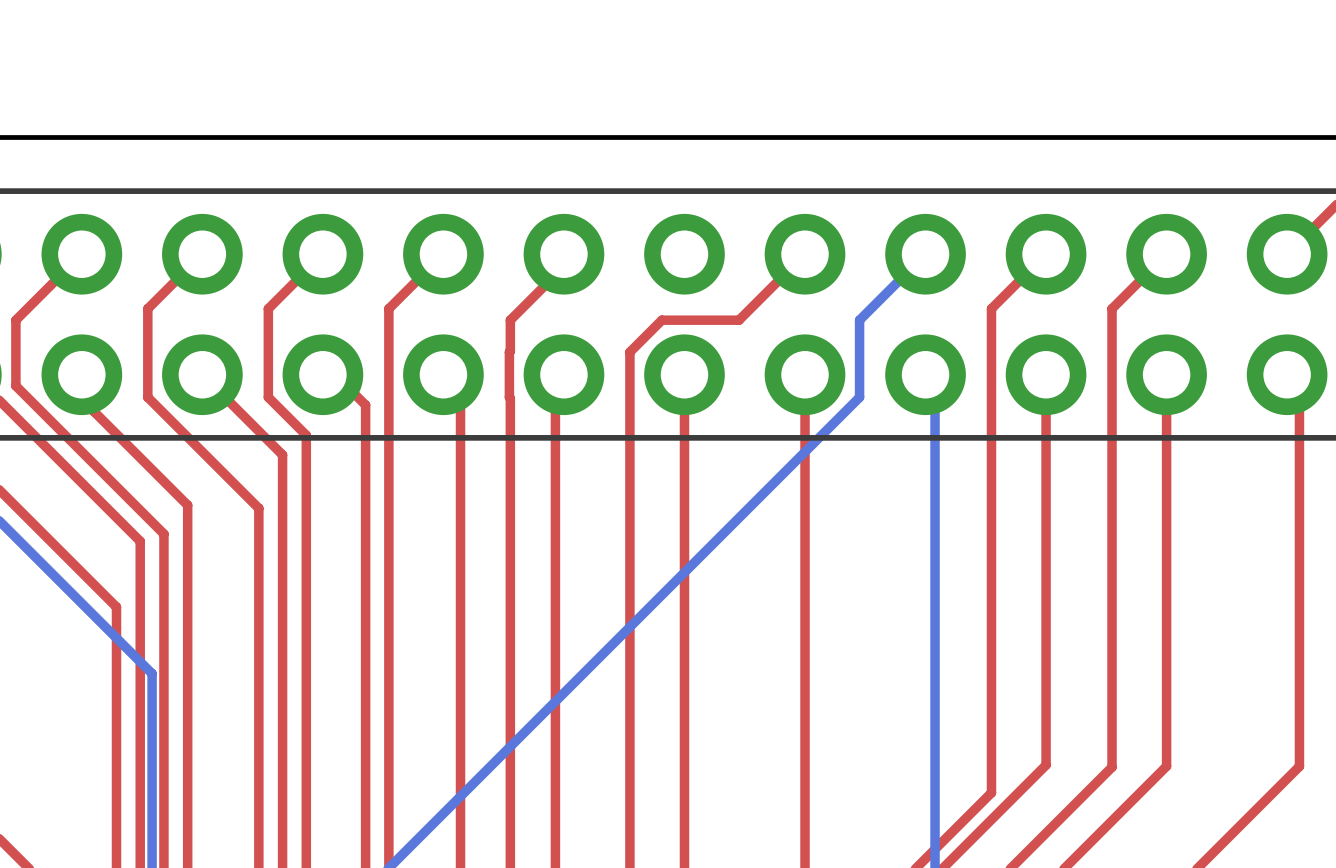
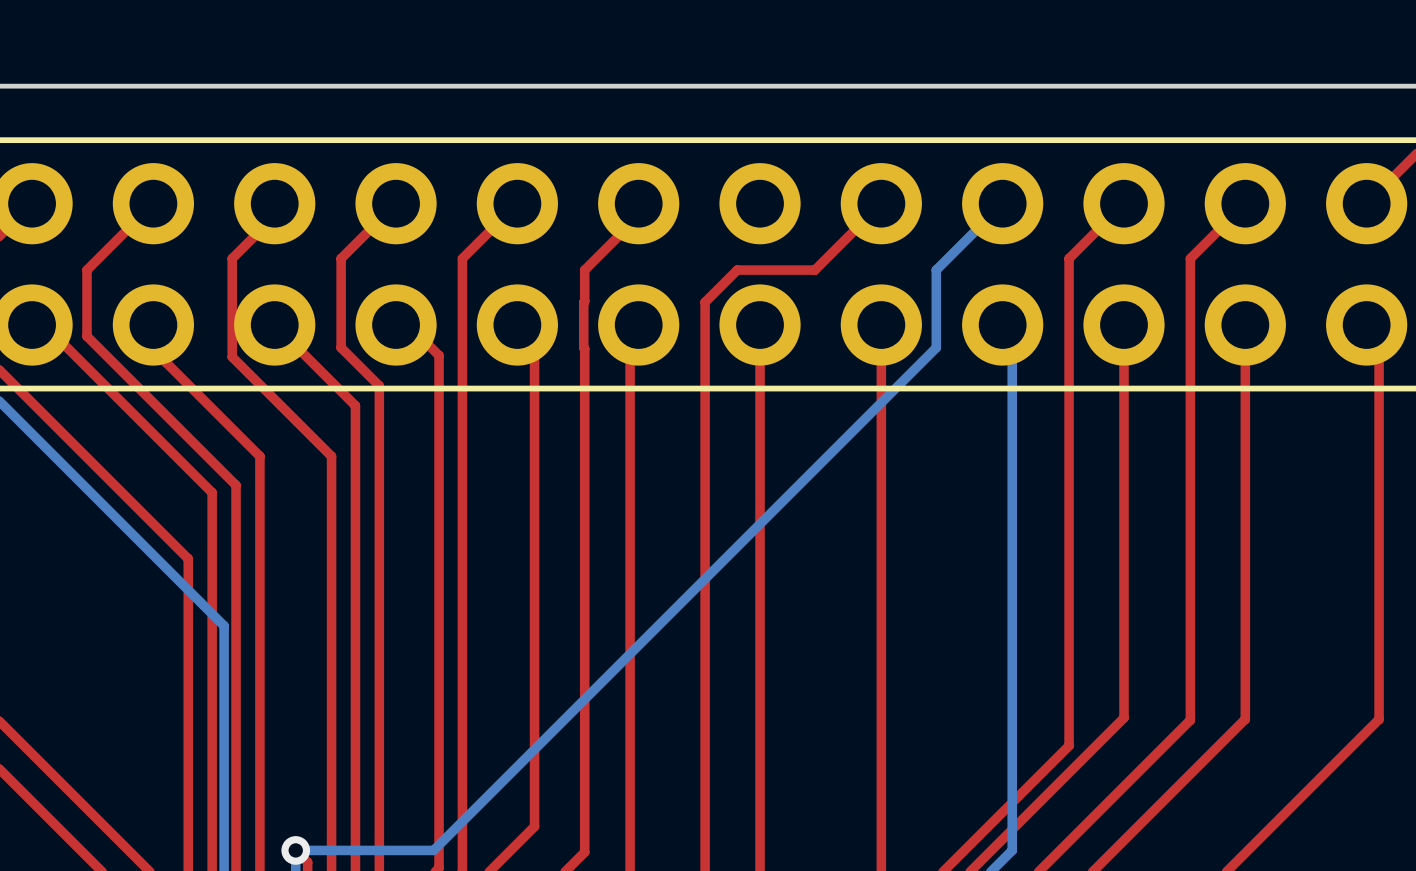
top track: (202, 254) (147, 308) (147, 397) (258, 508) -> (287, 203) (232, 258) (232, 357) (331, 456) (331, 459)

